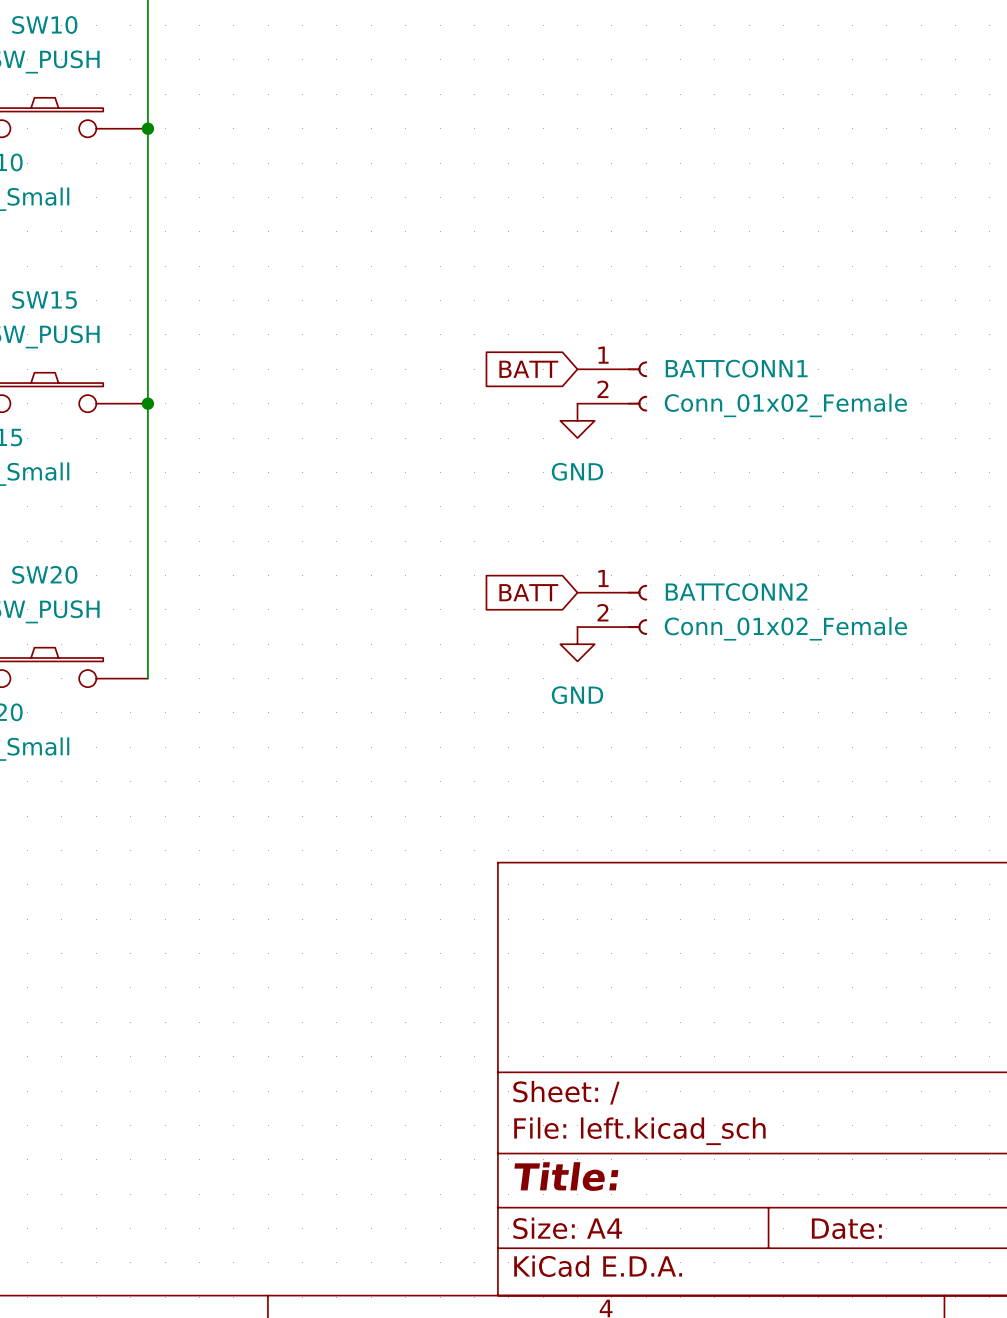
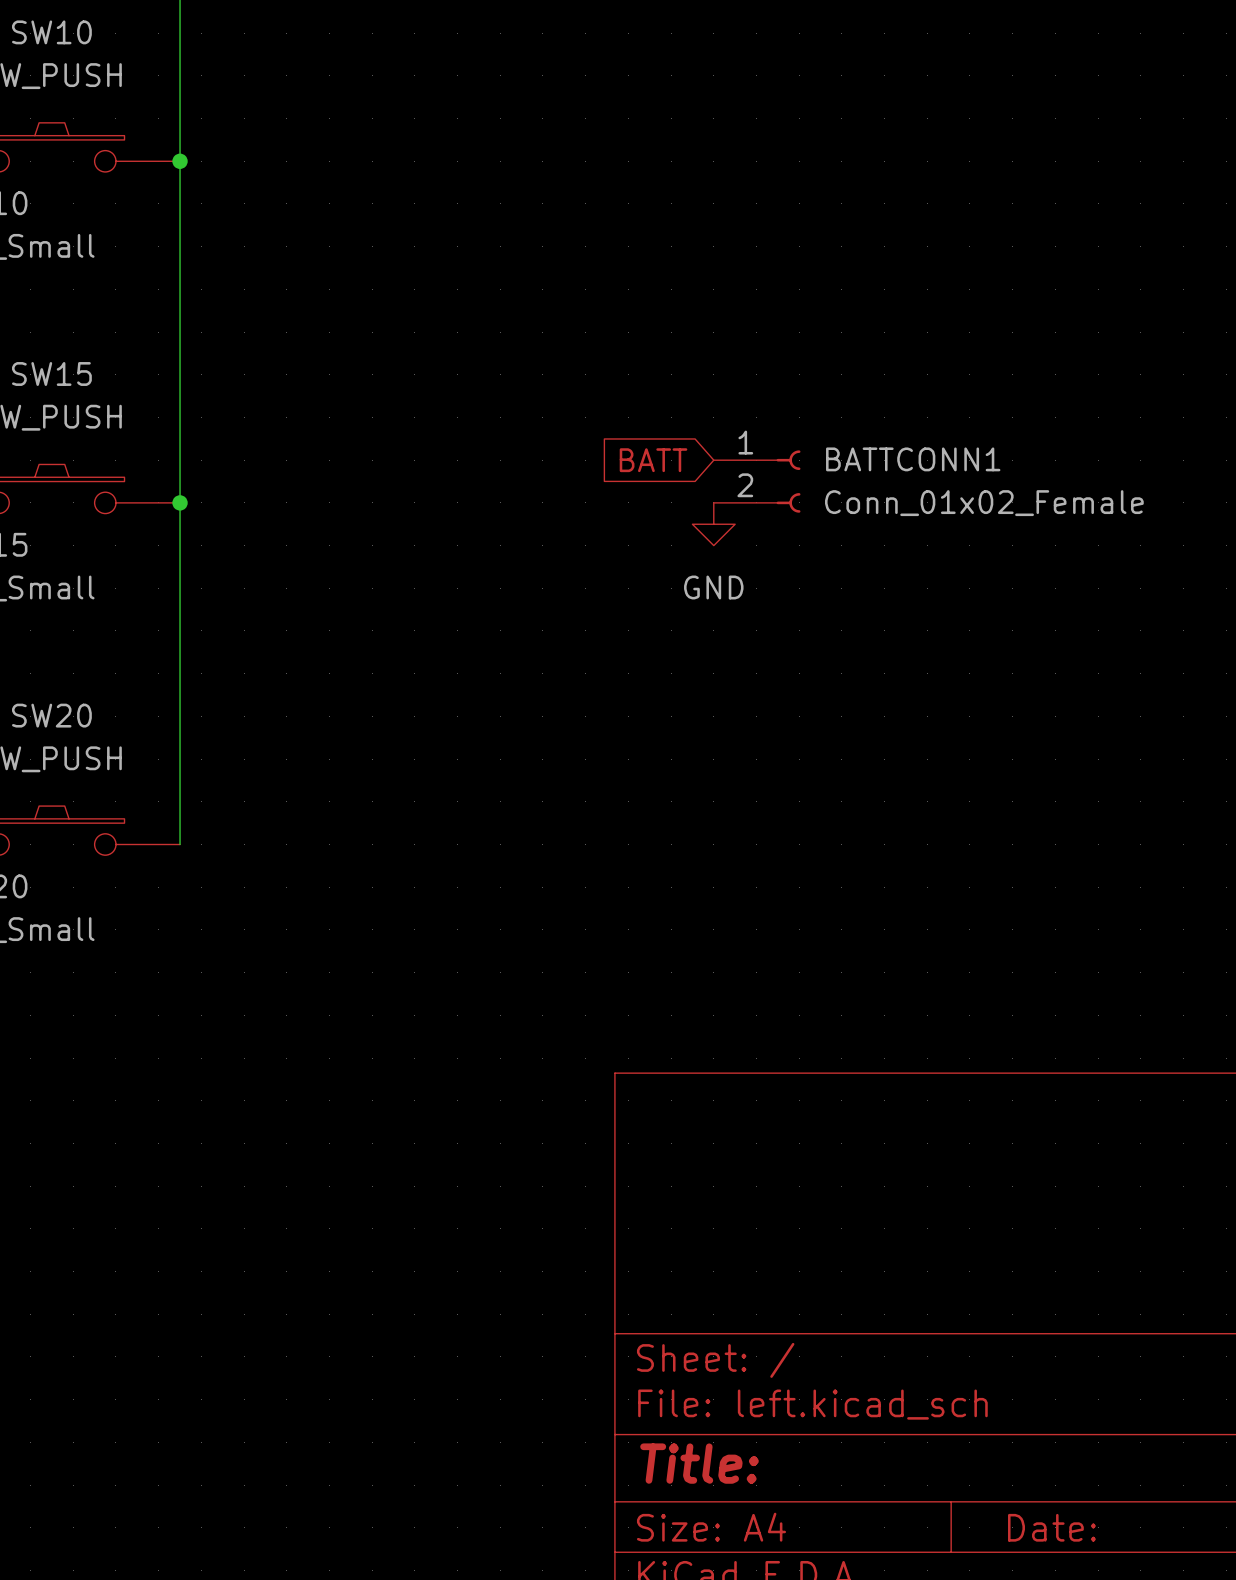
global label: BATT (528, 592) -> none
BATTCONN2: Conn_01x02_Female (612, 609) -> none
power symbol: GND (577, 644) -> none

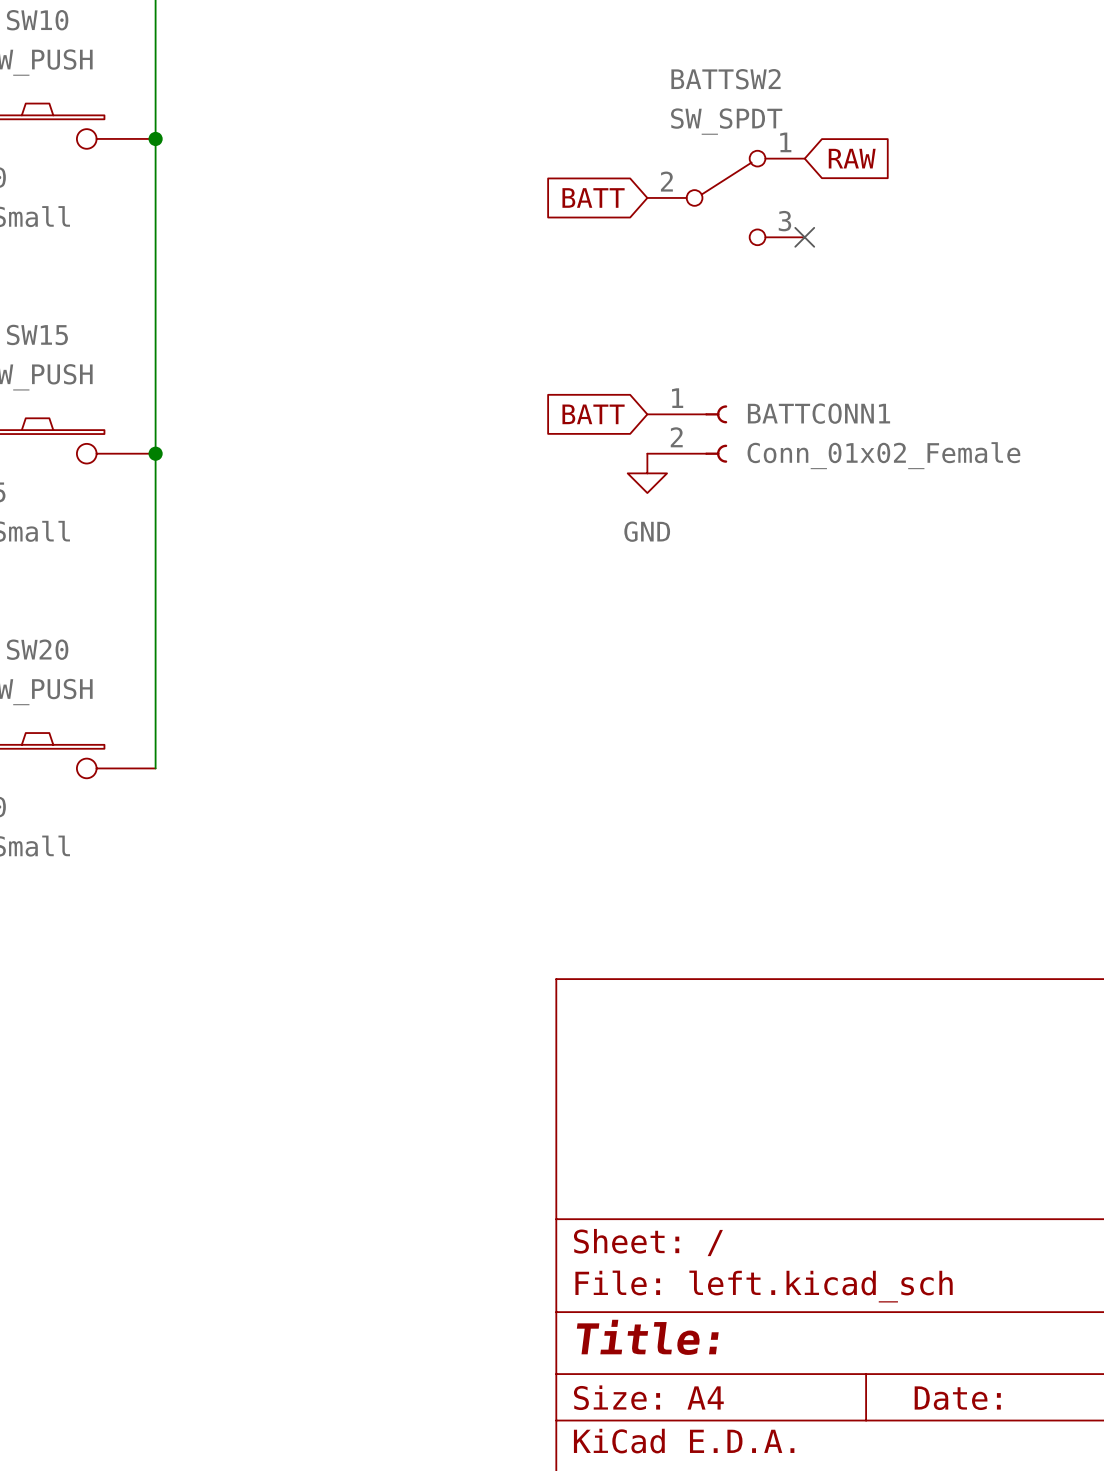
global label: none -> RAW (852, 158)
global label: none -> BATT (593, 197)
BATTSW2: none -> SW_SPDT (726, 197)
no-connect mark: none -> (804, 237)

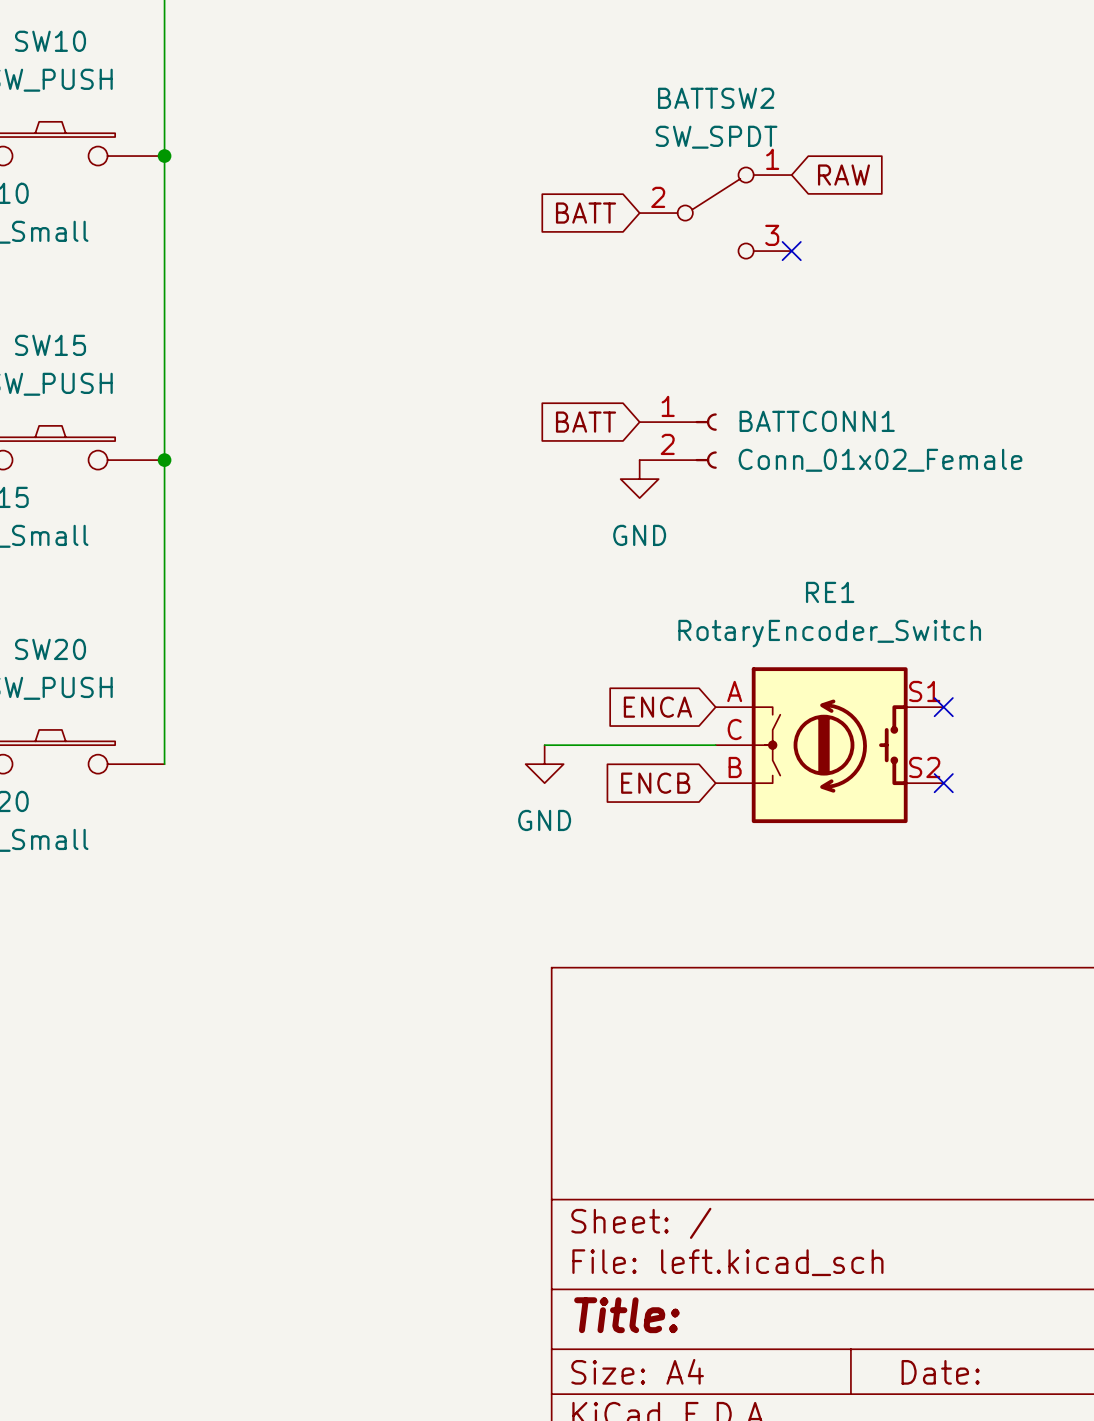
global label: none -> ENCA (657, 707)
no-connect mark: none -> (943, 707)
wire: none -> (544, 745) (715, 745)
RE1: none -> RotaryEncoder_Switch (829, 745)
power symbol: none -> GND (544, 764)
global label: none -> ENCB (655, 783)
no-connect mark: none -> (943, 783)

